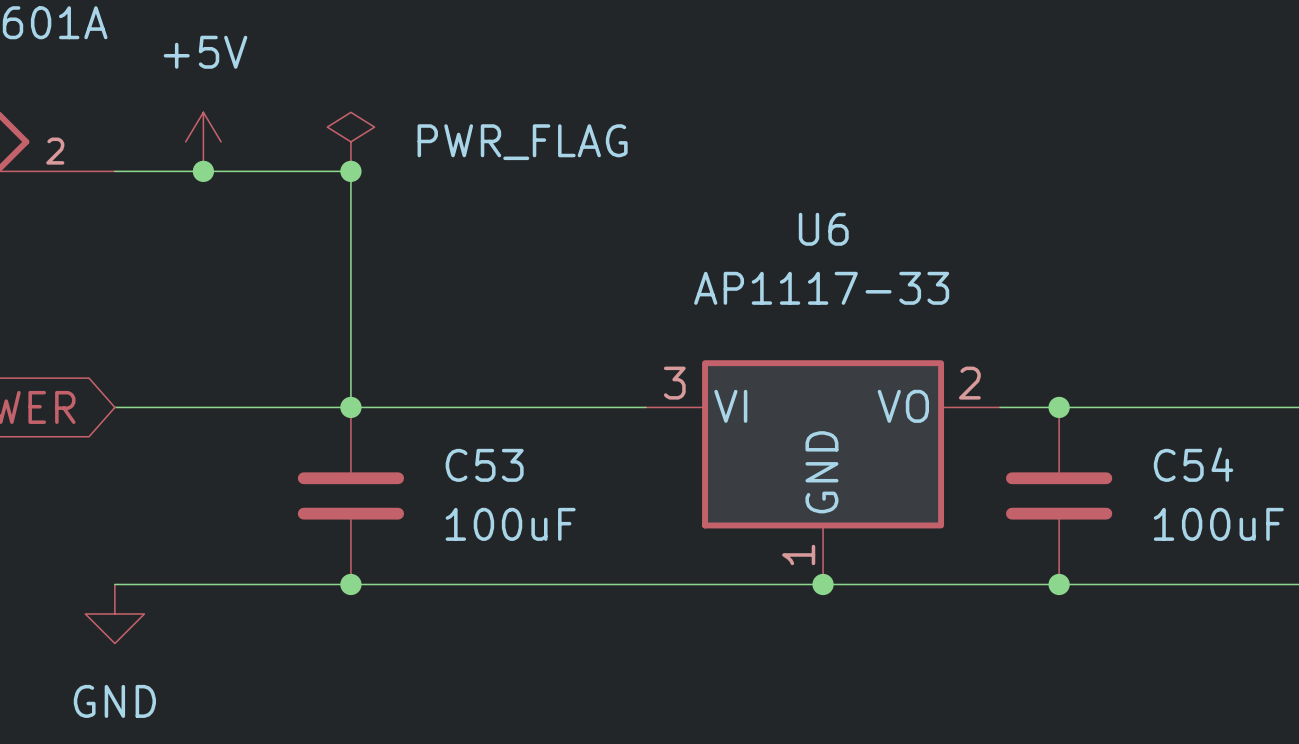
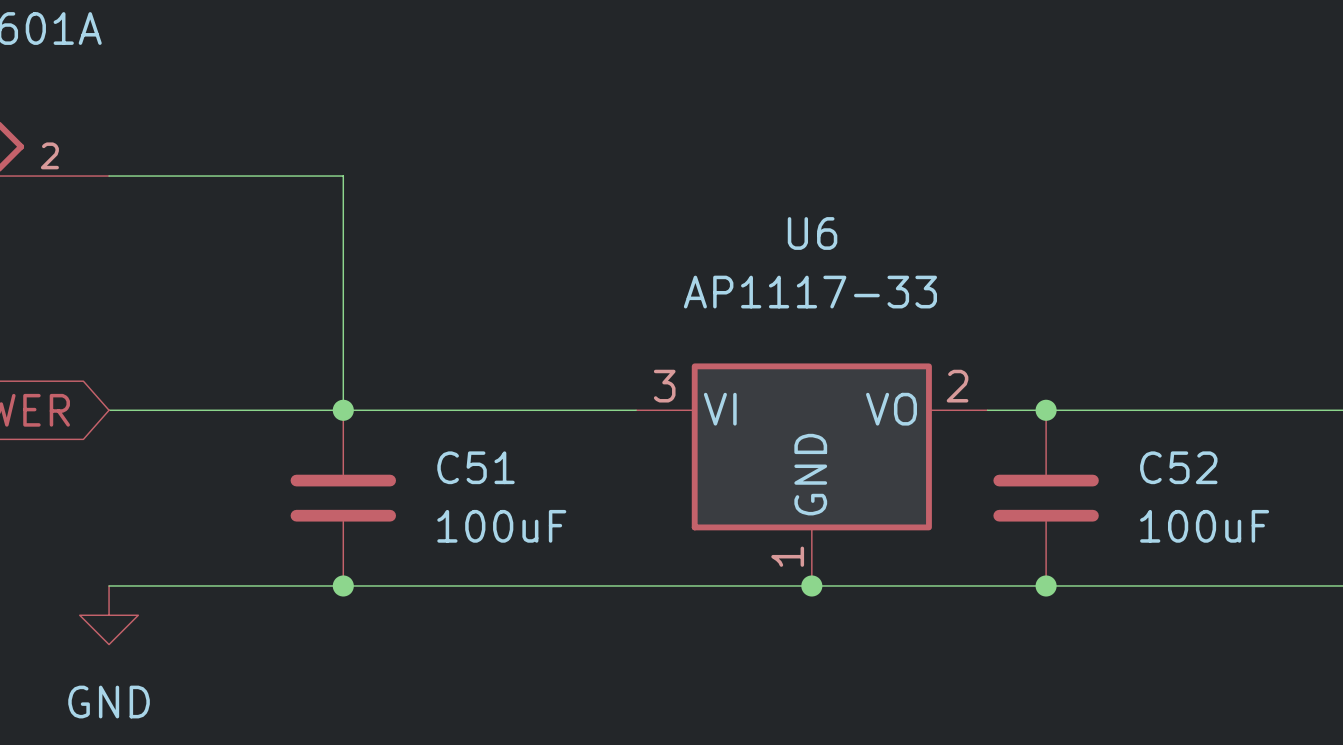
power symbol: +5V (203, 141) -> none
power symbol: PWR_FLAG (350, 141) -> none
junction: (203, 171) -> none
junction: (350, 171) -> none
C54 name: C54 (1193, 464) -> C52 (1178, 467)
C53 name: C53 (484, 465) -> C51 (475, 467)

